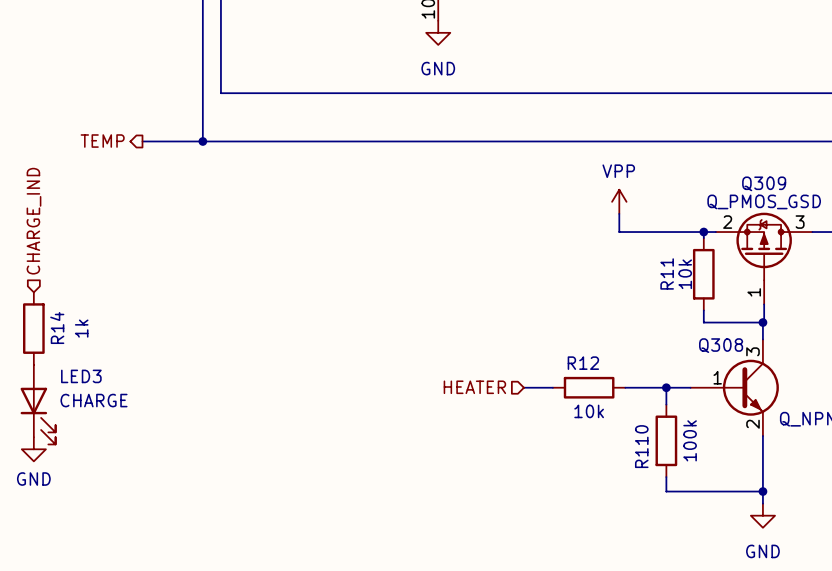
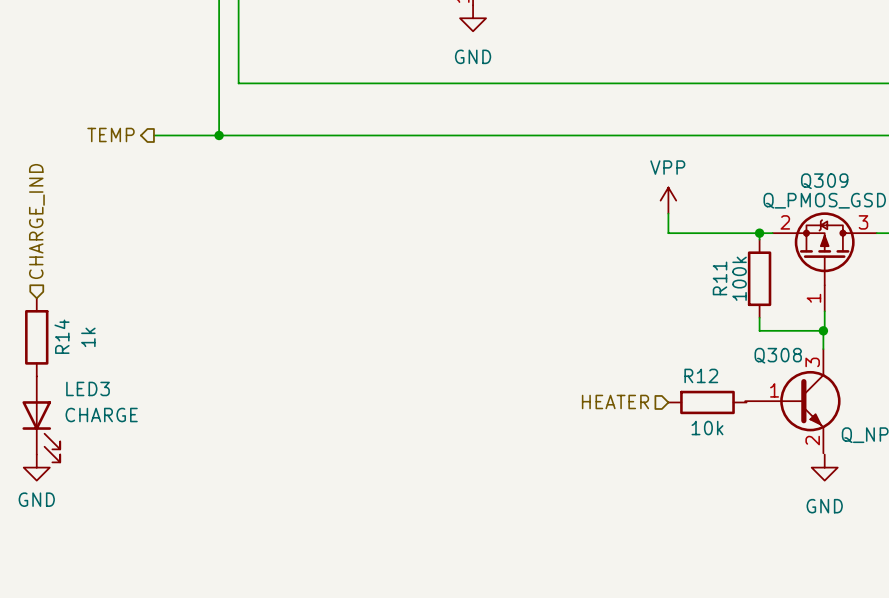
R11 value: 10k (685, 274) -> 100k (739, 278)
hierarchical label position: HEATER (474, 387) -> HEATER (615, 401)
wire: (523, 387) (552, 387) -> none
R12 position: (589, 387) -> (707, 402)
wire: (625, 387) (690, 387) -> none
wire: (666, 387) (666, 404) -> none
junction: (666, 387) -> none
wire: (762, 436) (762, 503) -> none
R110: 100k (666, 440) -> none
wire: (666, 477) (666, 491) (762, 491) -> none
junction: (762, 491) -> none
power symbol position: GND (762, 515) -> GND (824, 467)

